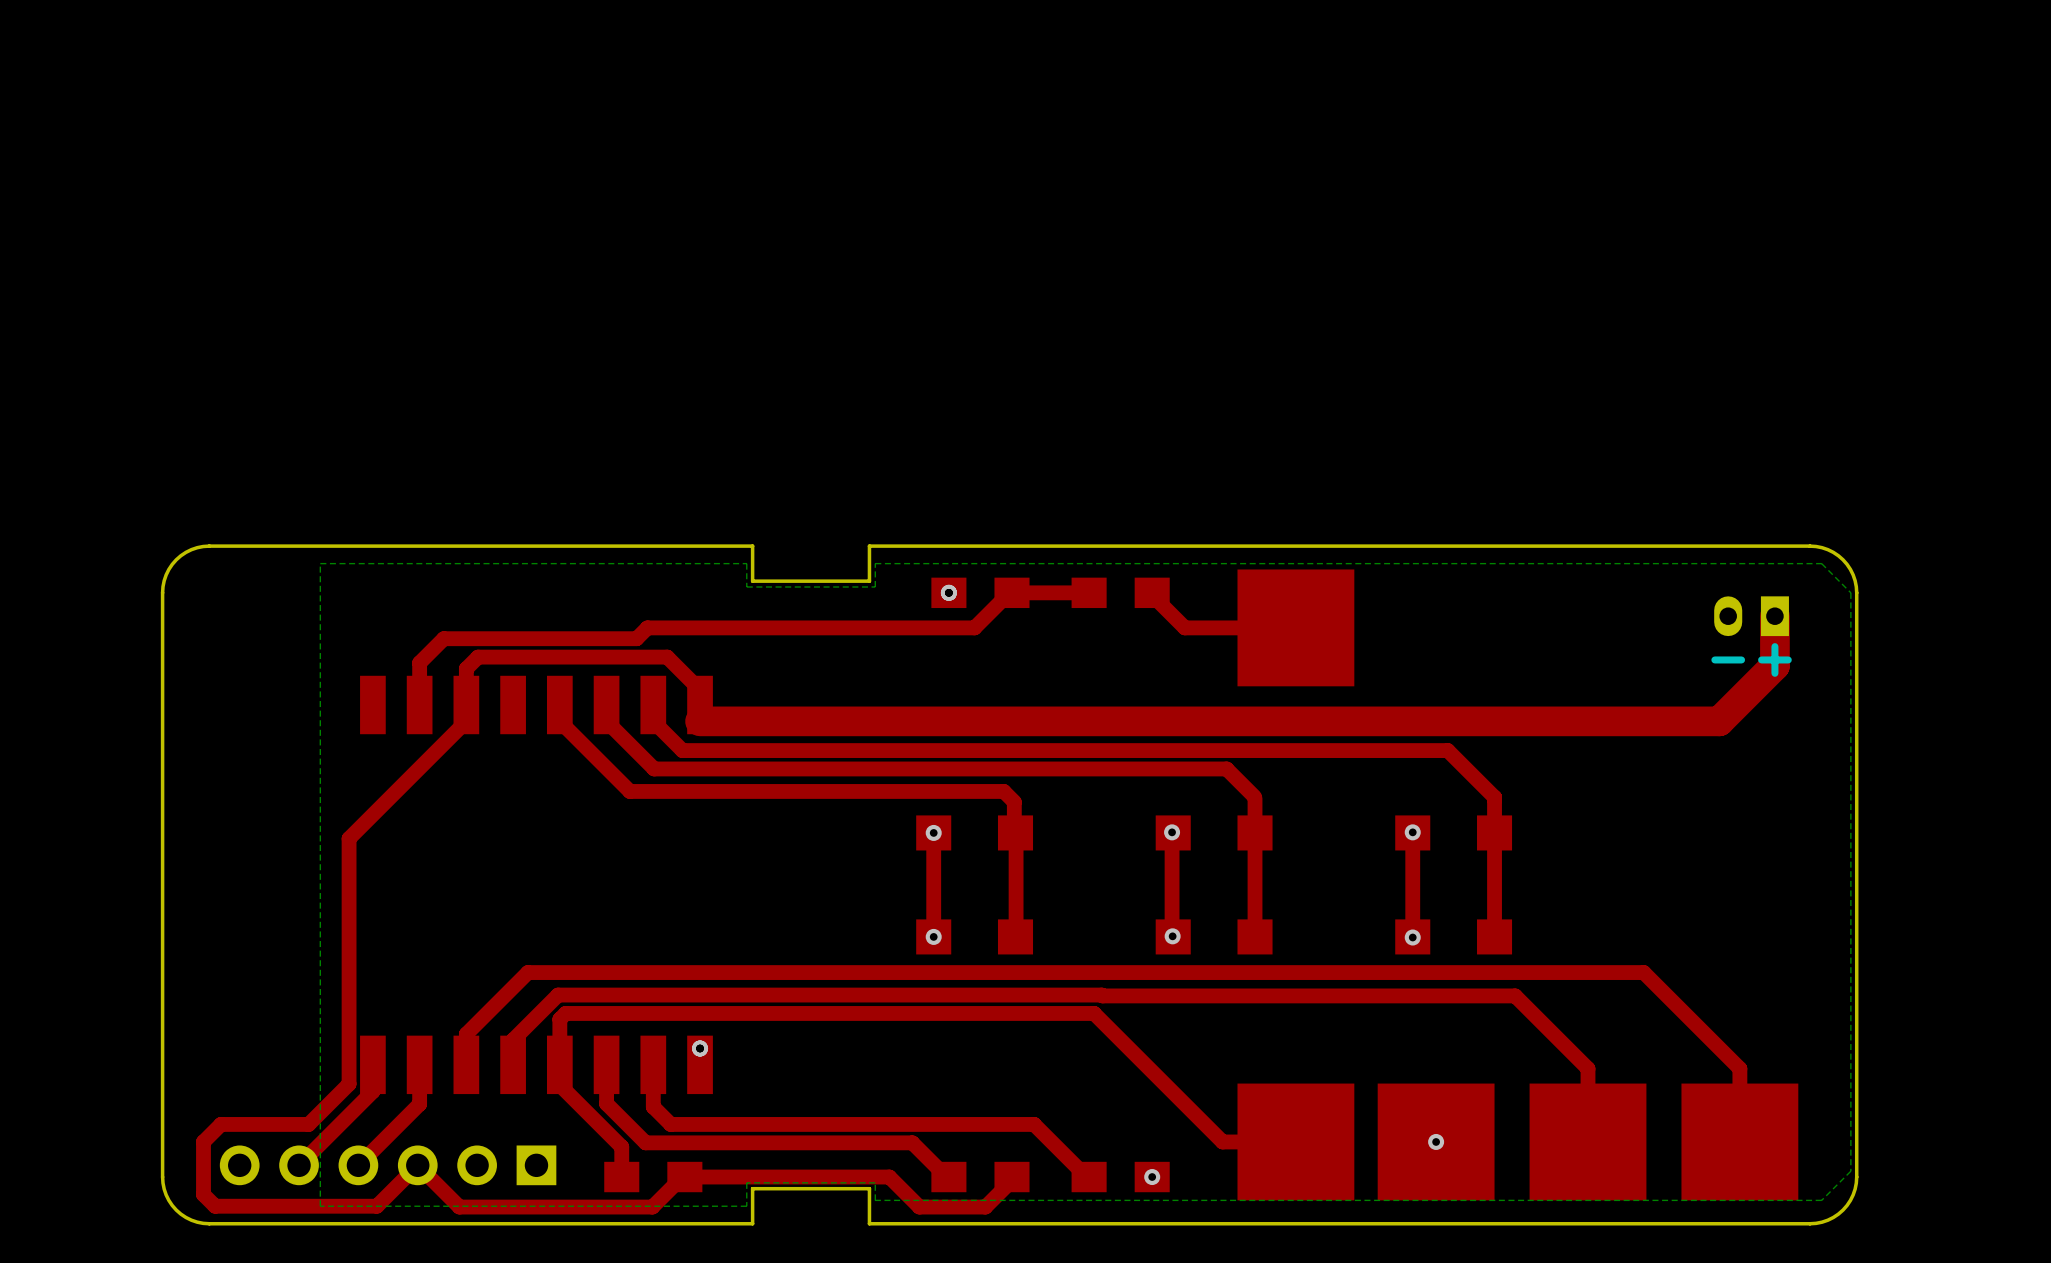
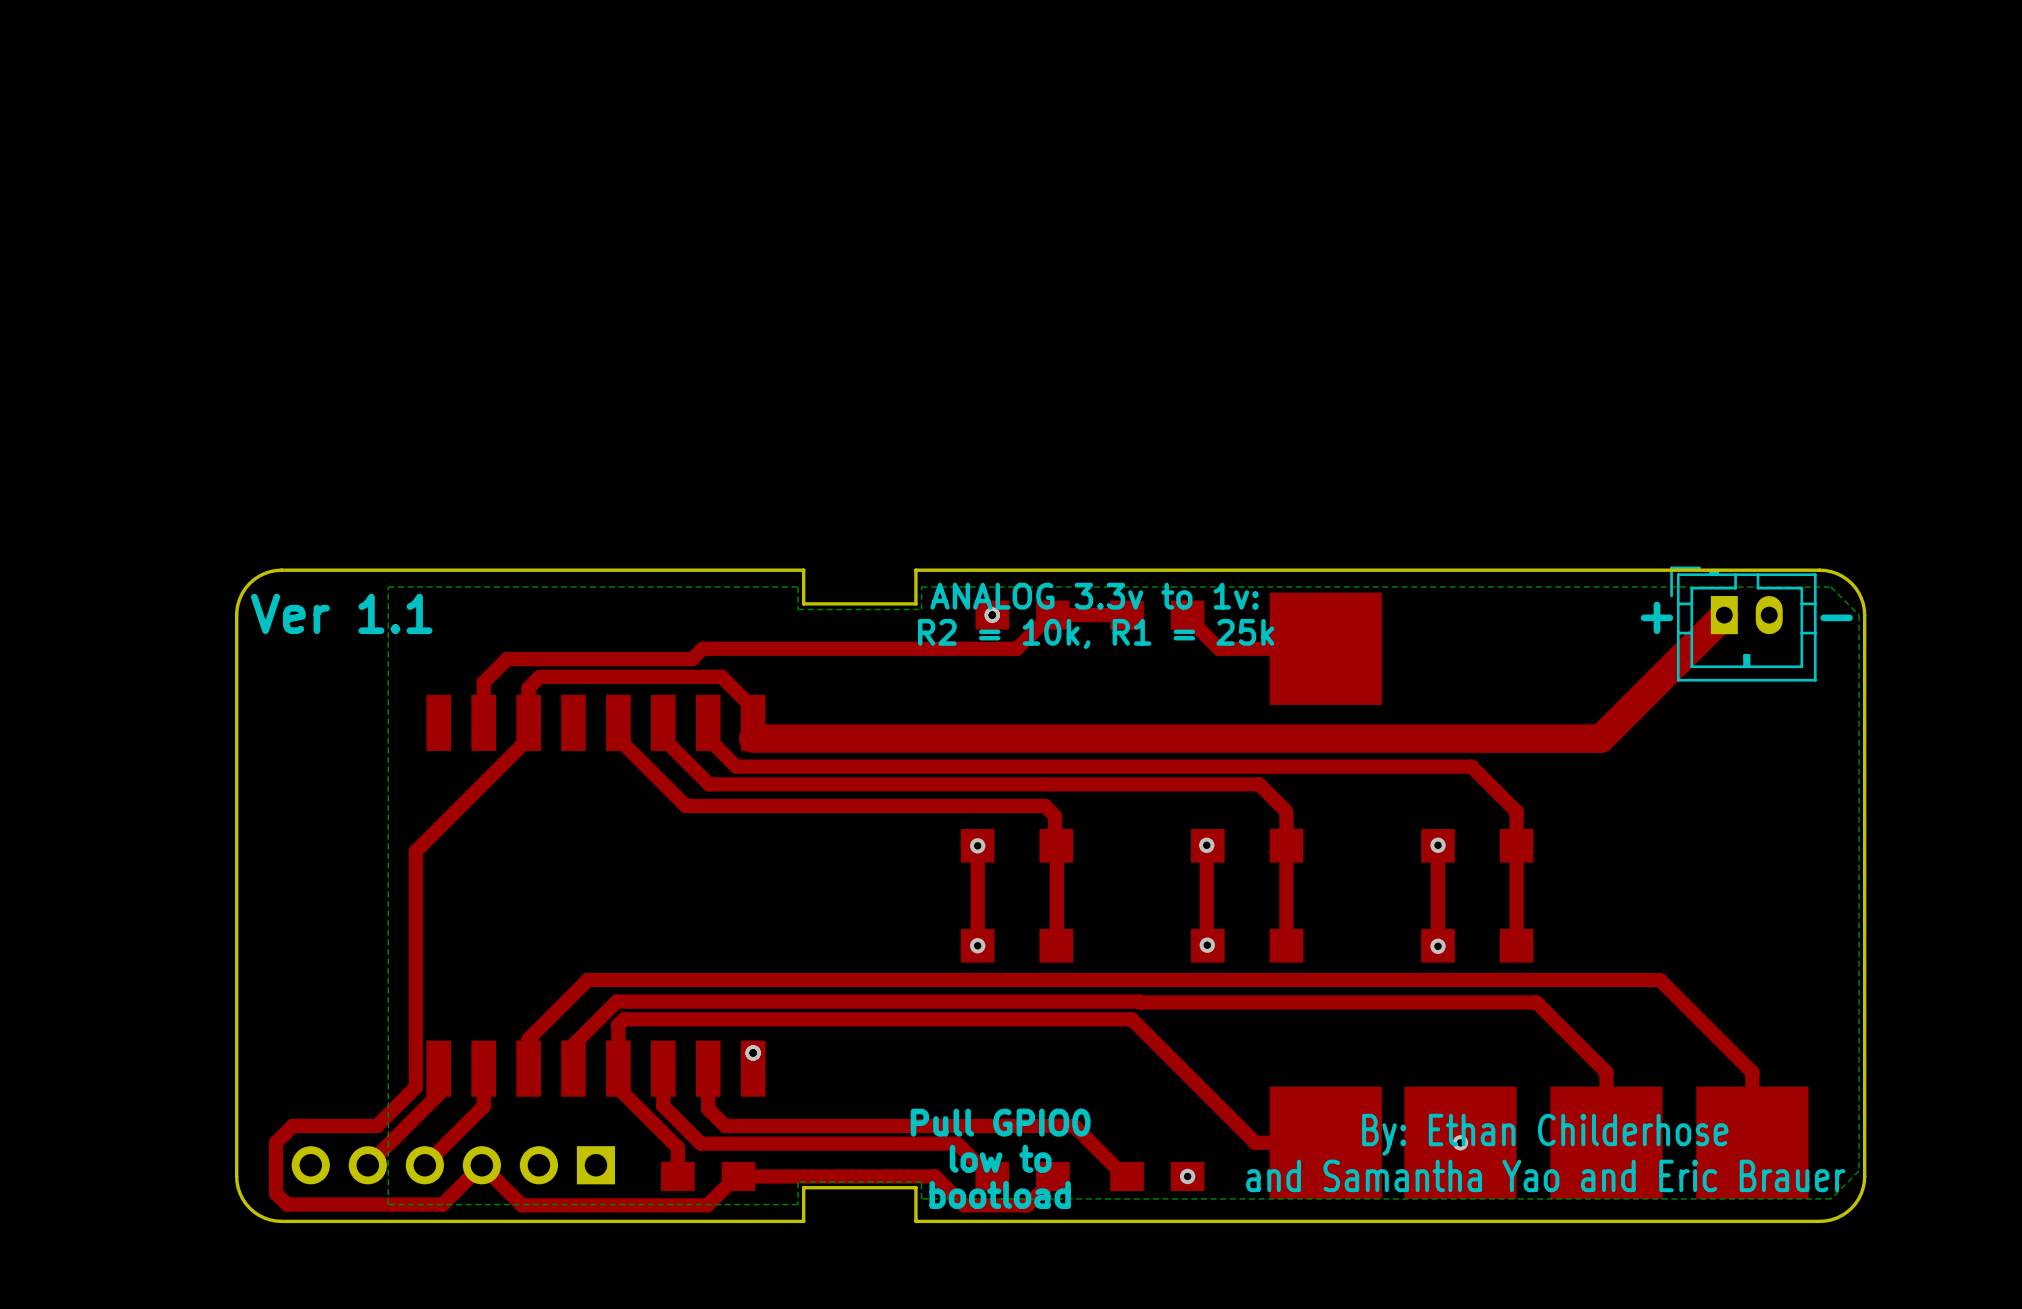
text: none -> ANALOG 3.3v to 1v: (1094, 596)
text: none -> Ver 1.1 (341, 613)
text: none -> R2 = 10k, R1 = 25k (1096, 633)
part side: top (1751, 616) -> bottom (1743, 624)
top track: (1774, 616) (1774, 665) (1719, 721) (1582, 721) -> (1724, 615) (1600, 738)
text position: - (1728, 659) -> - (1836, 617)
text position: + (1774, 659) -> + (1656, 617)
text: none -> Pull GPIO0 (1000, 1122)
text: none -> By: Ethan Childerhose (1545, 1134)
text: none -> low to (1000, 1158)
text: none -> and Samantha Yao and Eric Brauer (1545, 1175)
text: none -> bootload (1000, 1194)

